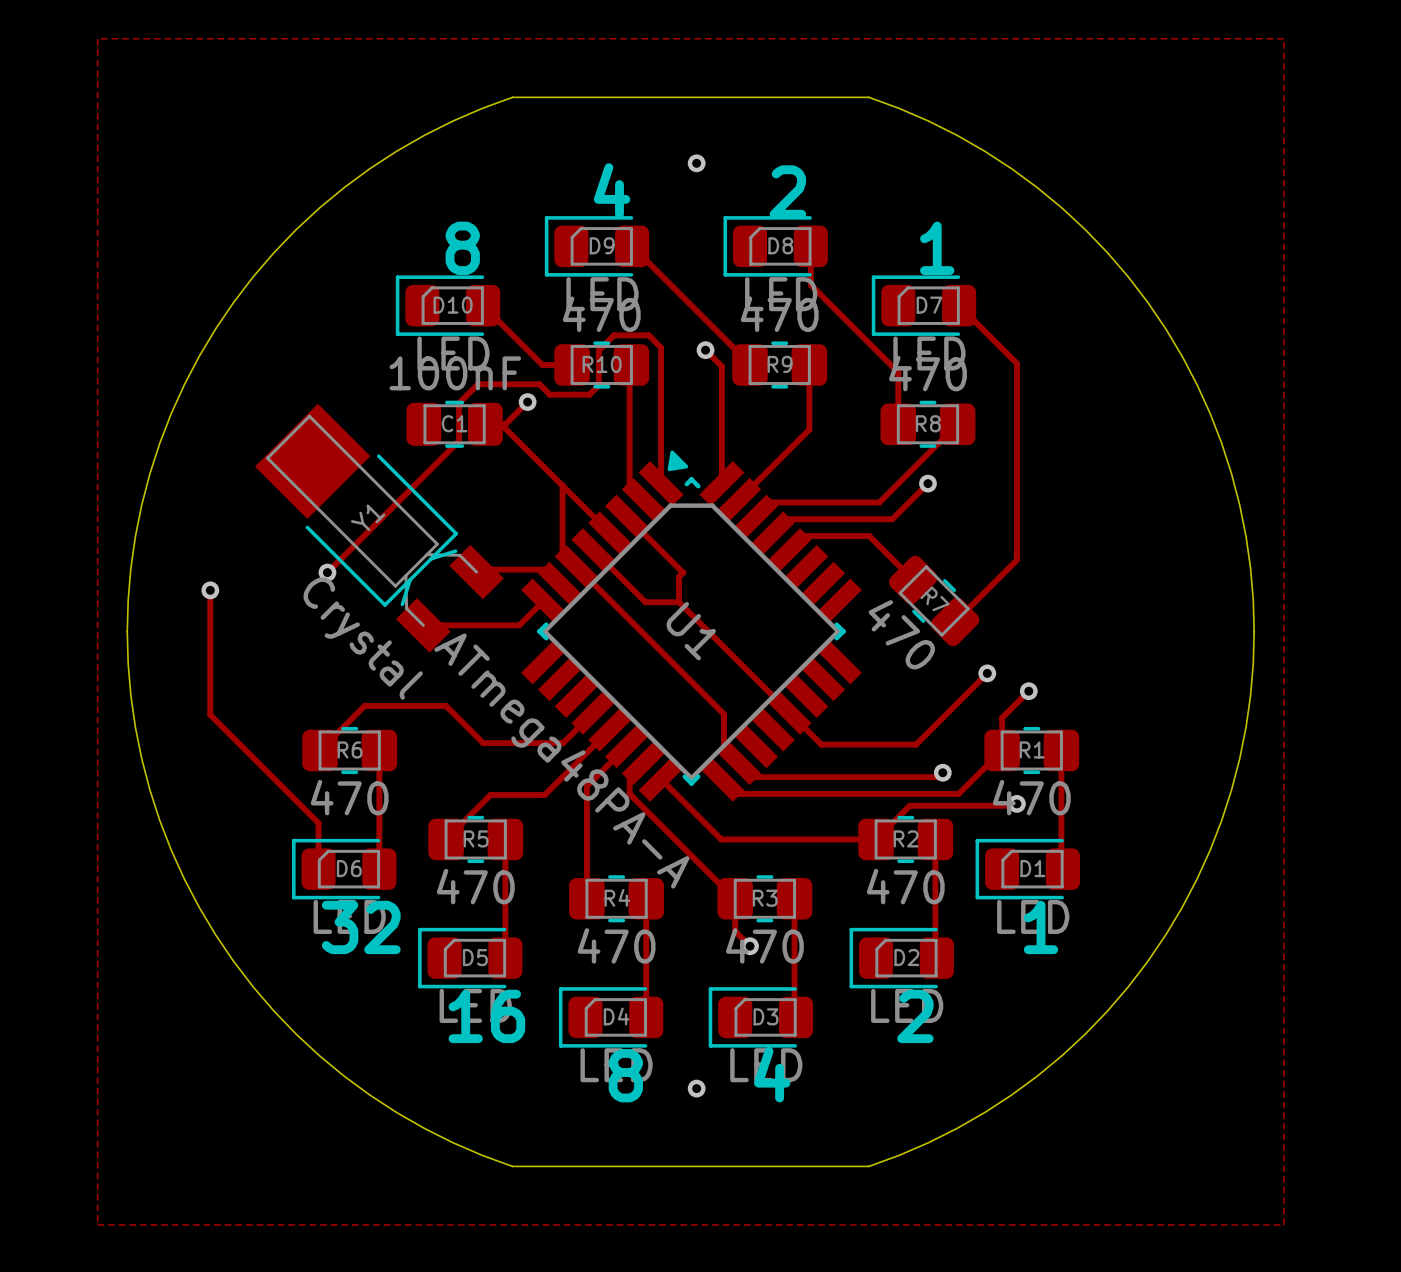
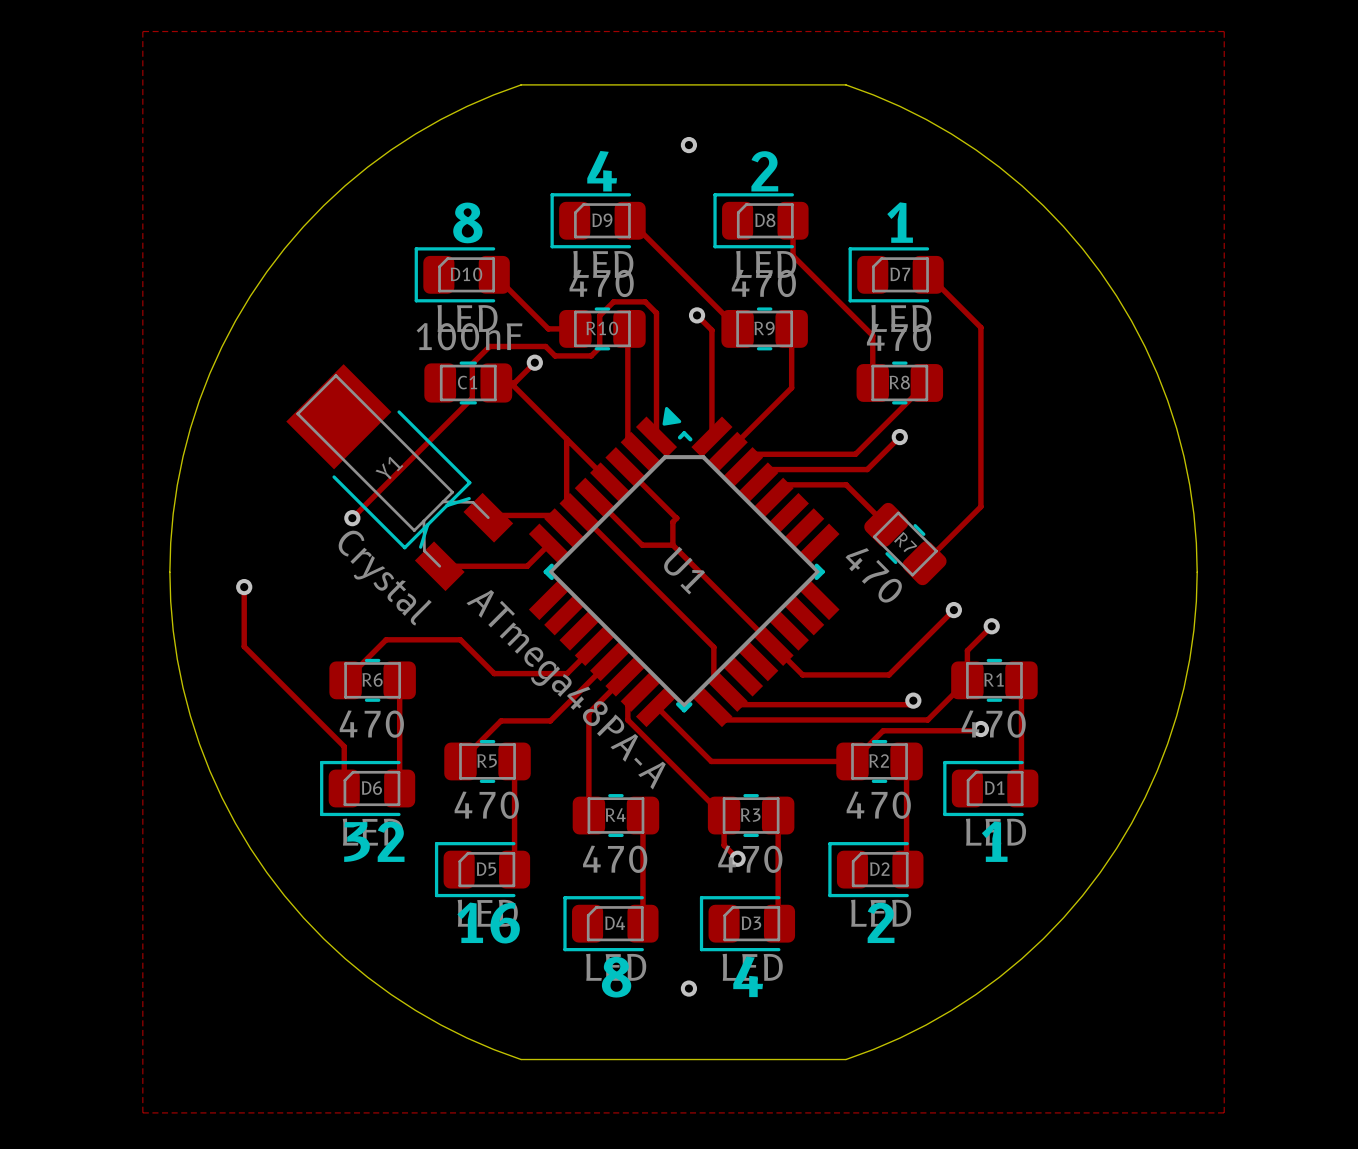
track: (210, 590) (210, 714) -> (245, 588) (244, 587) (245, 647)
via position: (210, 590) -> (244, 587)

